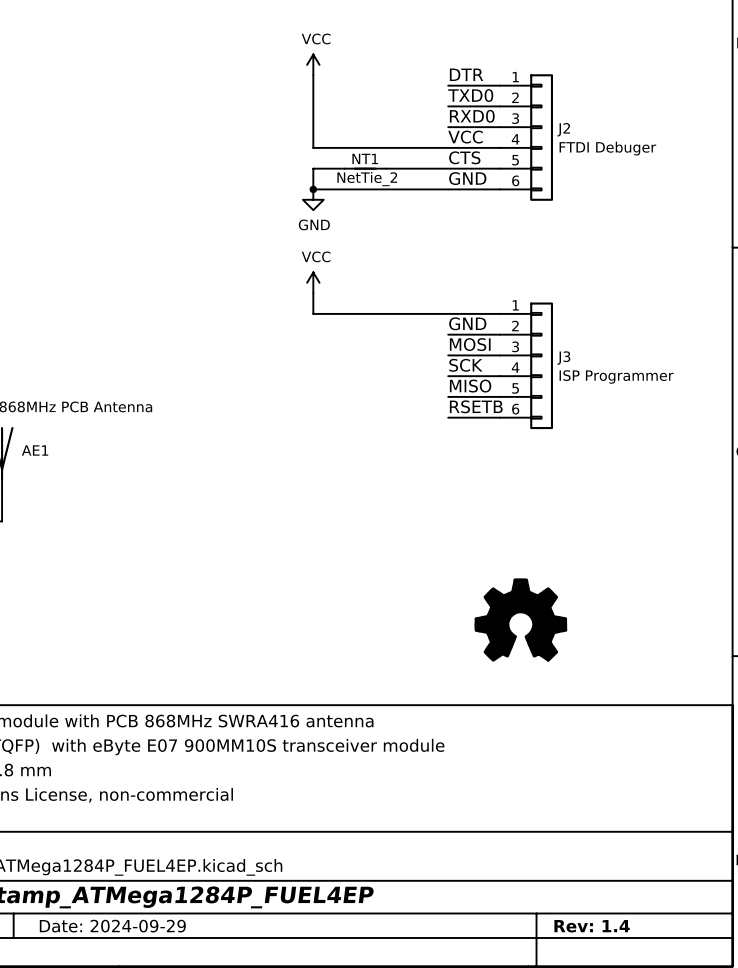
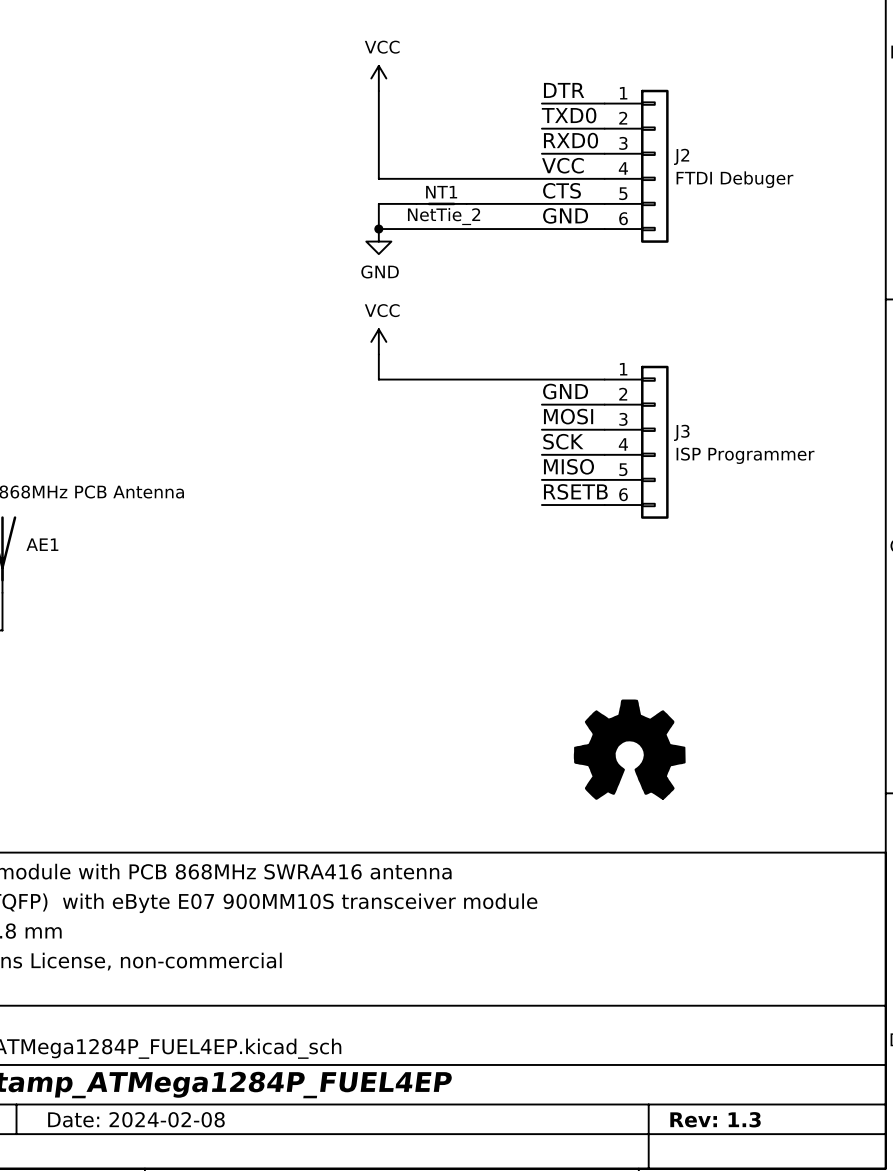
title block: Date: 2024-09-29 (112, 926) -> Date: 2024-02-08 (136, 1119)
title block: Rev: 1.4 (592, 926) -> Rev: 1.3 (715, 1119)

